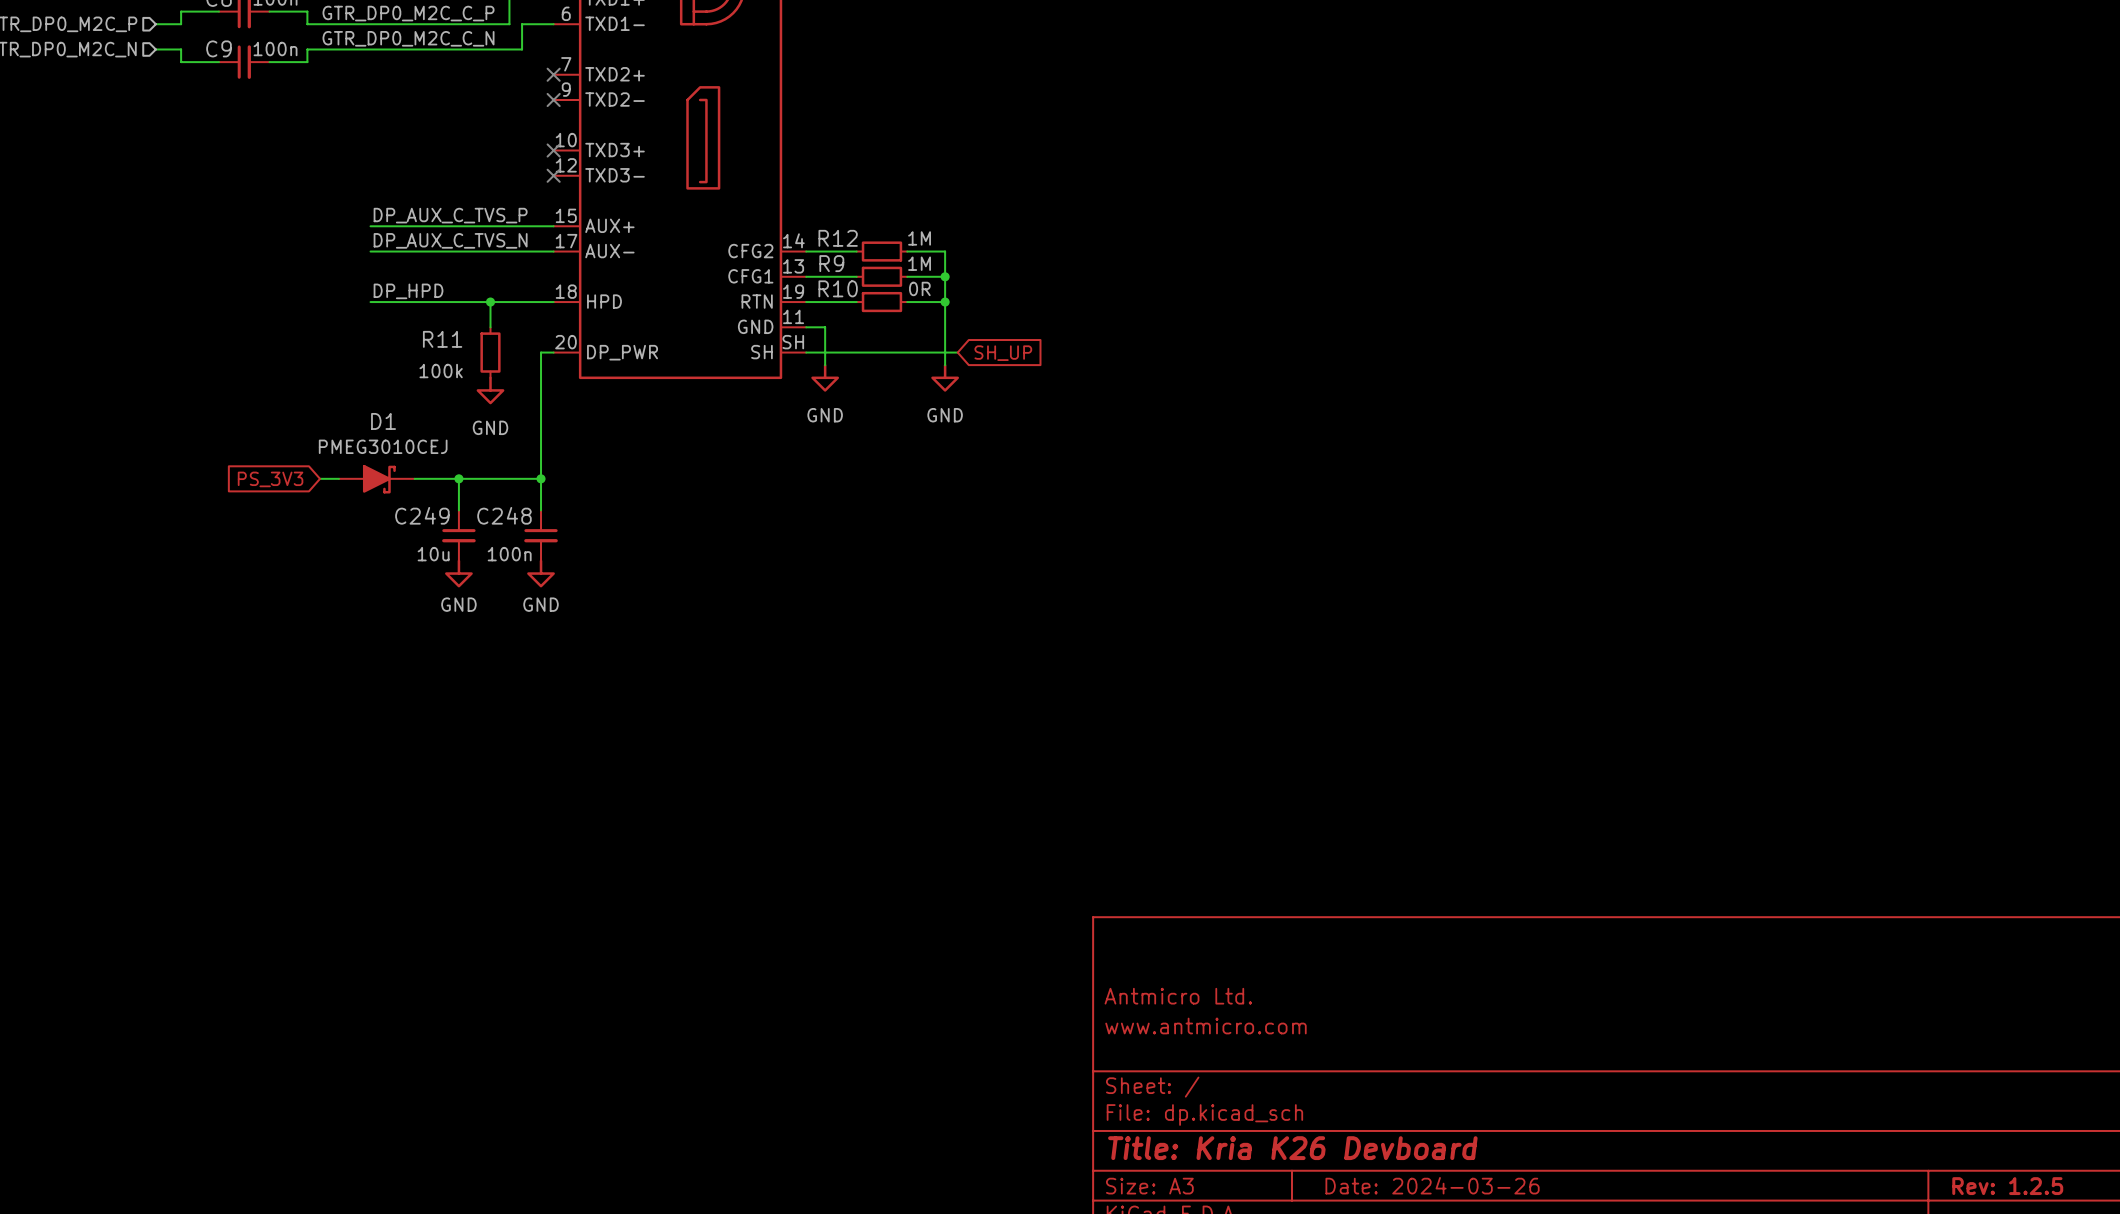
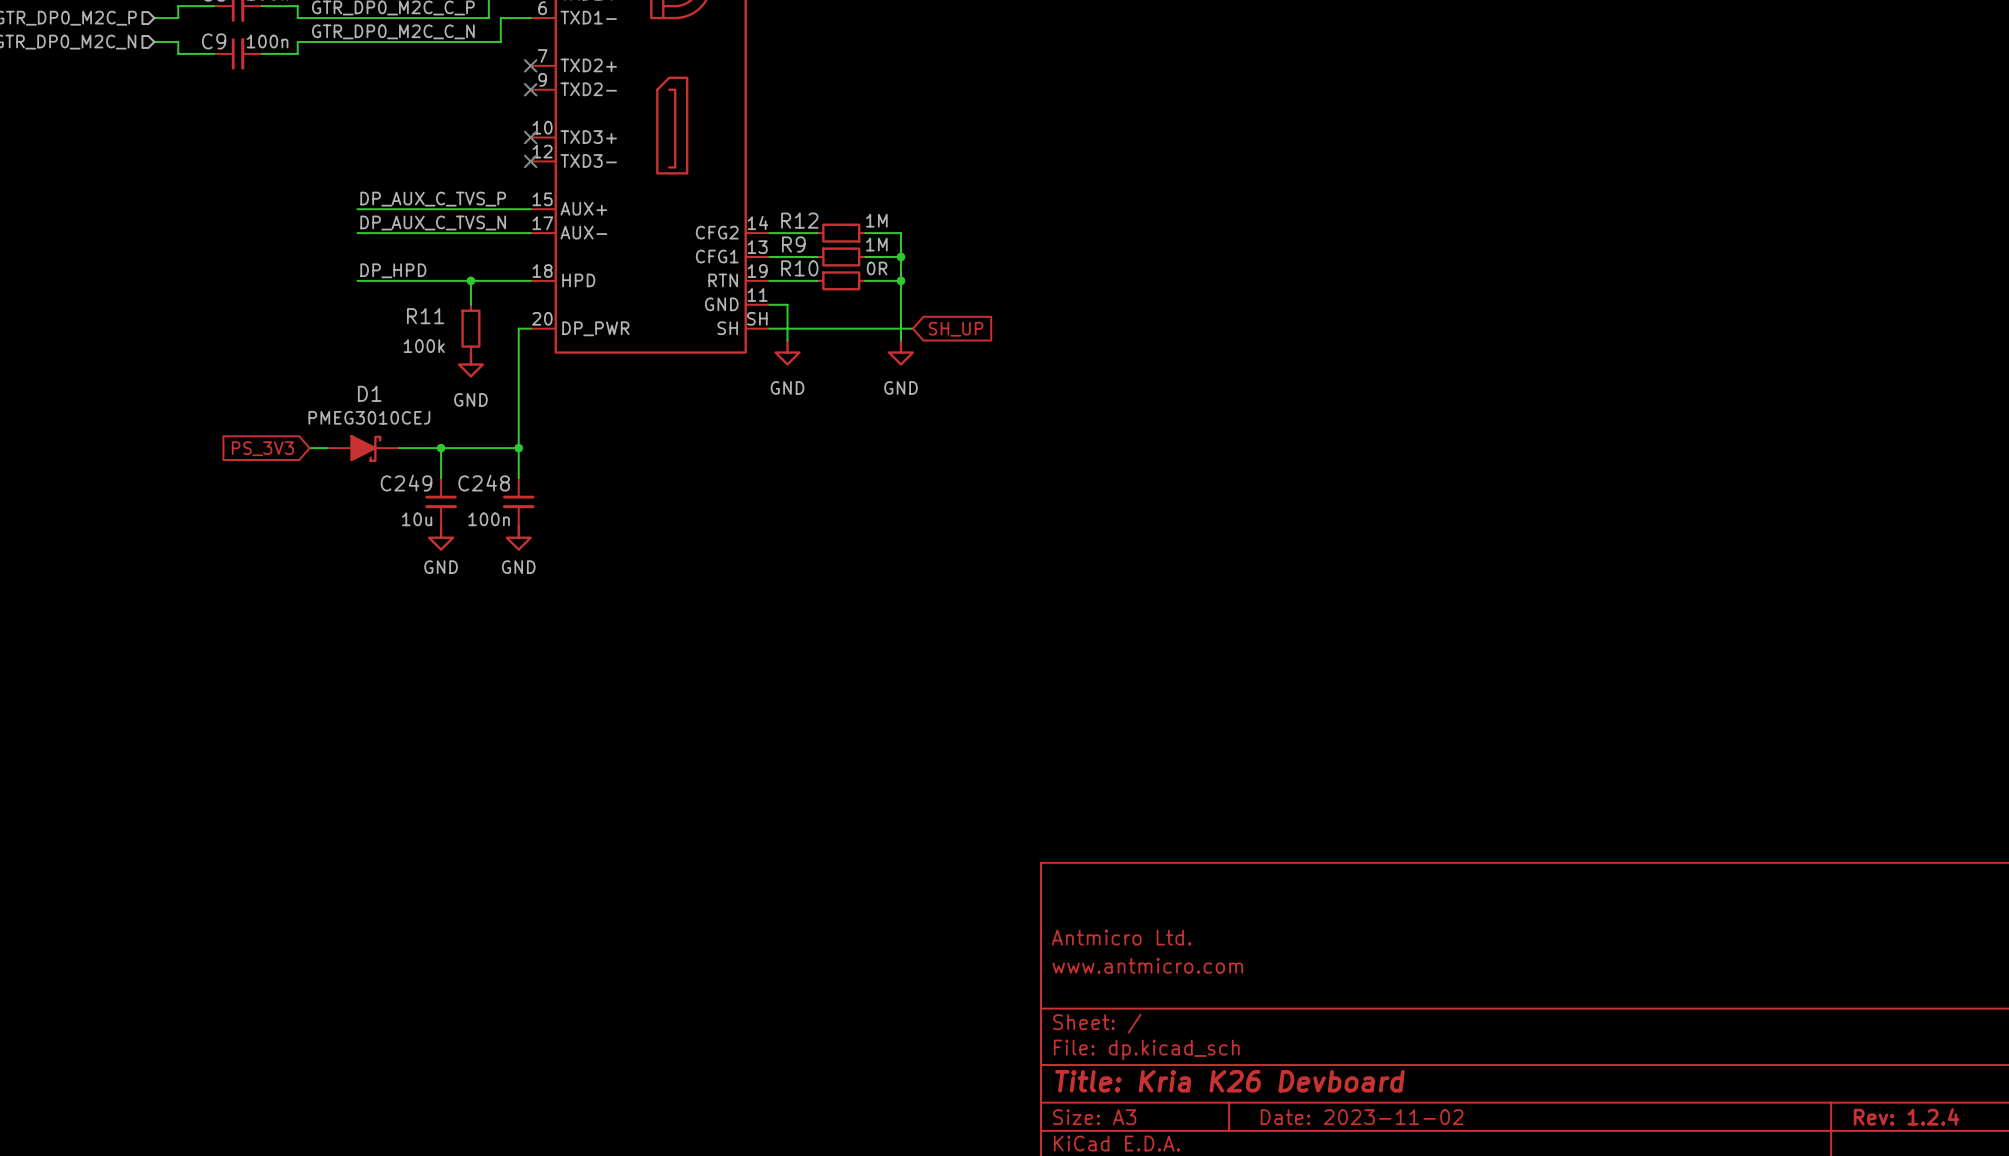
title block: Date: 2024-03-26 (1432, 1185) -> Date: 2023-11-02 (1362, 1117)
title block: Rev: 1.2.5 (2007, 1186) -> Rev: 1.2.4 (1906, 1116)

